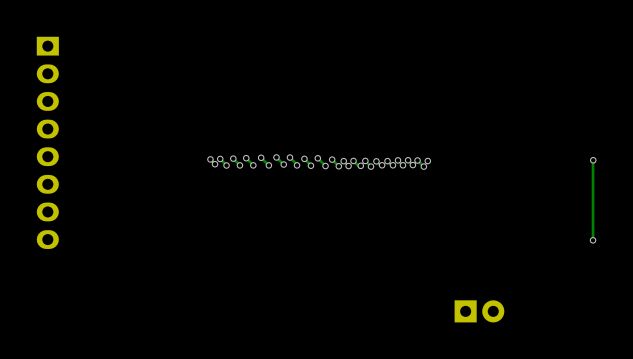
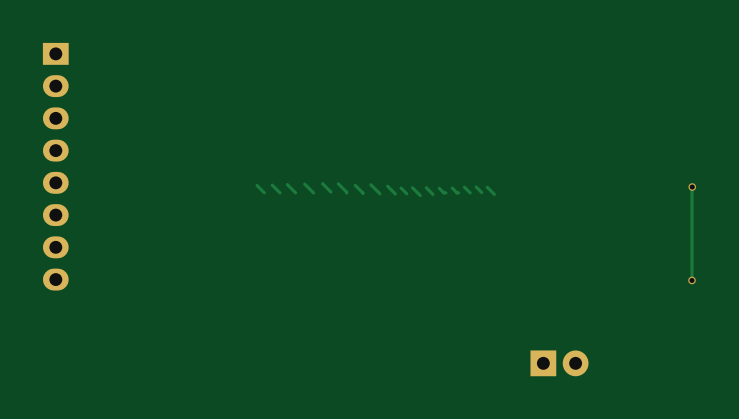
via: (261, 157) -> none
via: (276, 157) -> none
via: (289, 157) -> none
via: (220, 158) -> none
via: (233, 158) -> none
via: (246, 158) -> none
via: (304, 158) -> none
via: (317, 158) -> none
via: (210, 159) -> none
via: (332, 159) -> none
via: (353, 160) -> none
via: (365, 160) -> none
via: (397, 160) -> none
via: (408, 160) -> none
via: (417, 160) -> none
via: (343, 161) -> none
via: (376, 161) -> none
via: (387, 161) -> none
via: (427, 161) -> none
via: (215, 164) -> none
via: (283, 164) -> none
via: (226, 165) -> none
via: (239, 165) -> none
via: (253, 165) -> none
via: (268, 165) -> none
via: (297, 165) -> none
via: (310, 165) -> none
via: (360, 165) -> none
via: (382, 165) -> none
via: (392, 165) -> none
via: (402, 165) -> none
via: (412, 165) -> none
via: (325, 166) -> none
via: (338, 166) -> none
via: (348, 166) -> none
via: (371, 166) -> none
via: (423, 166) -> none

